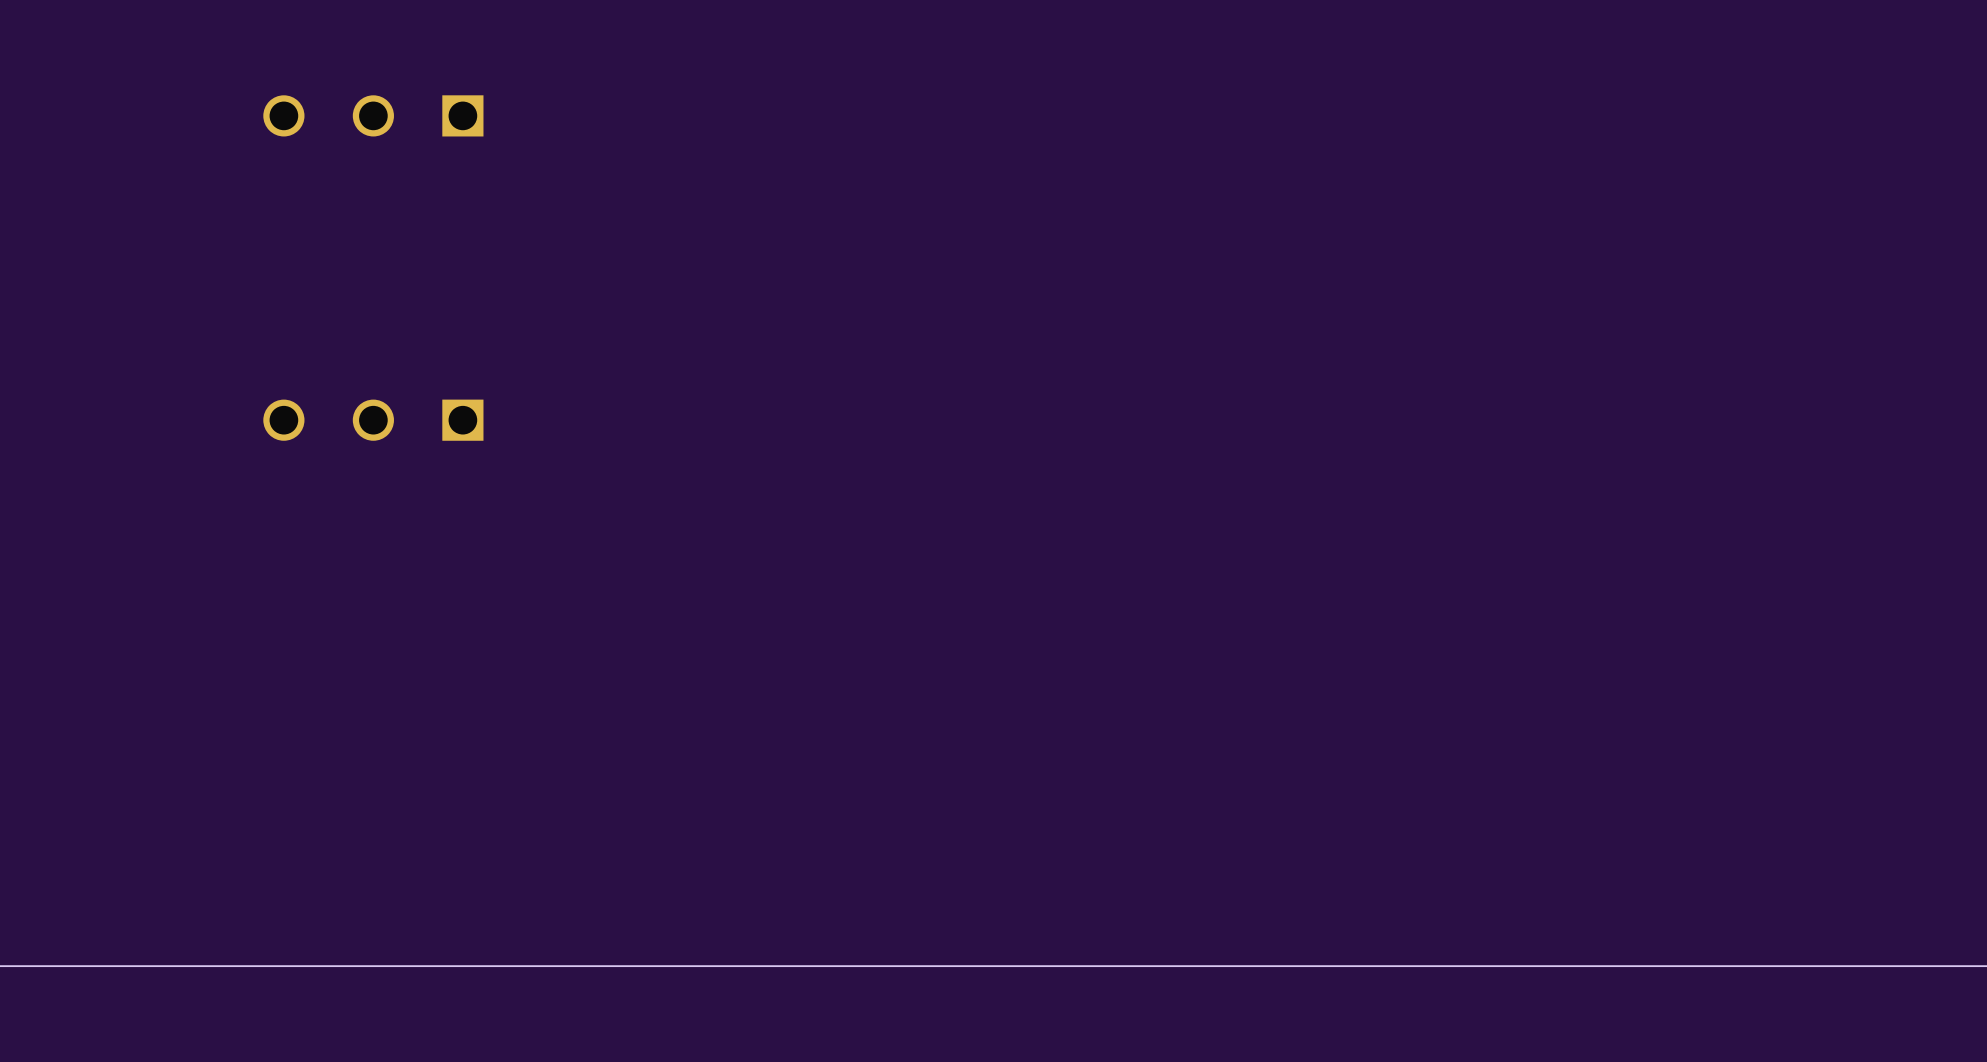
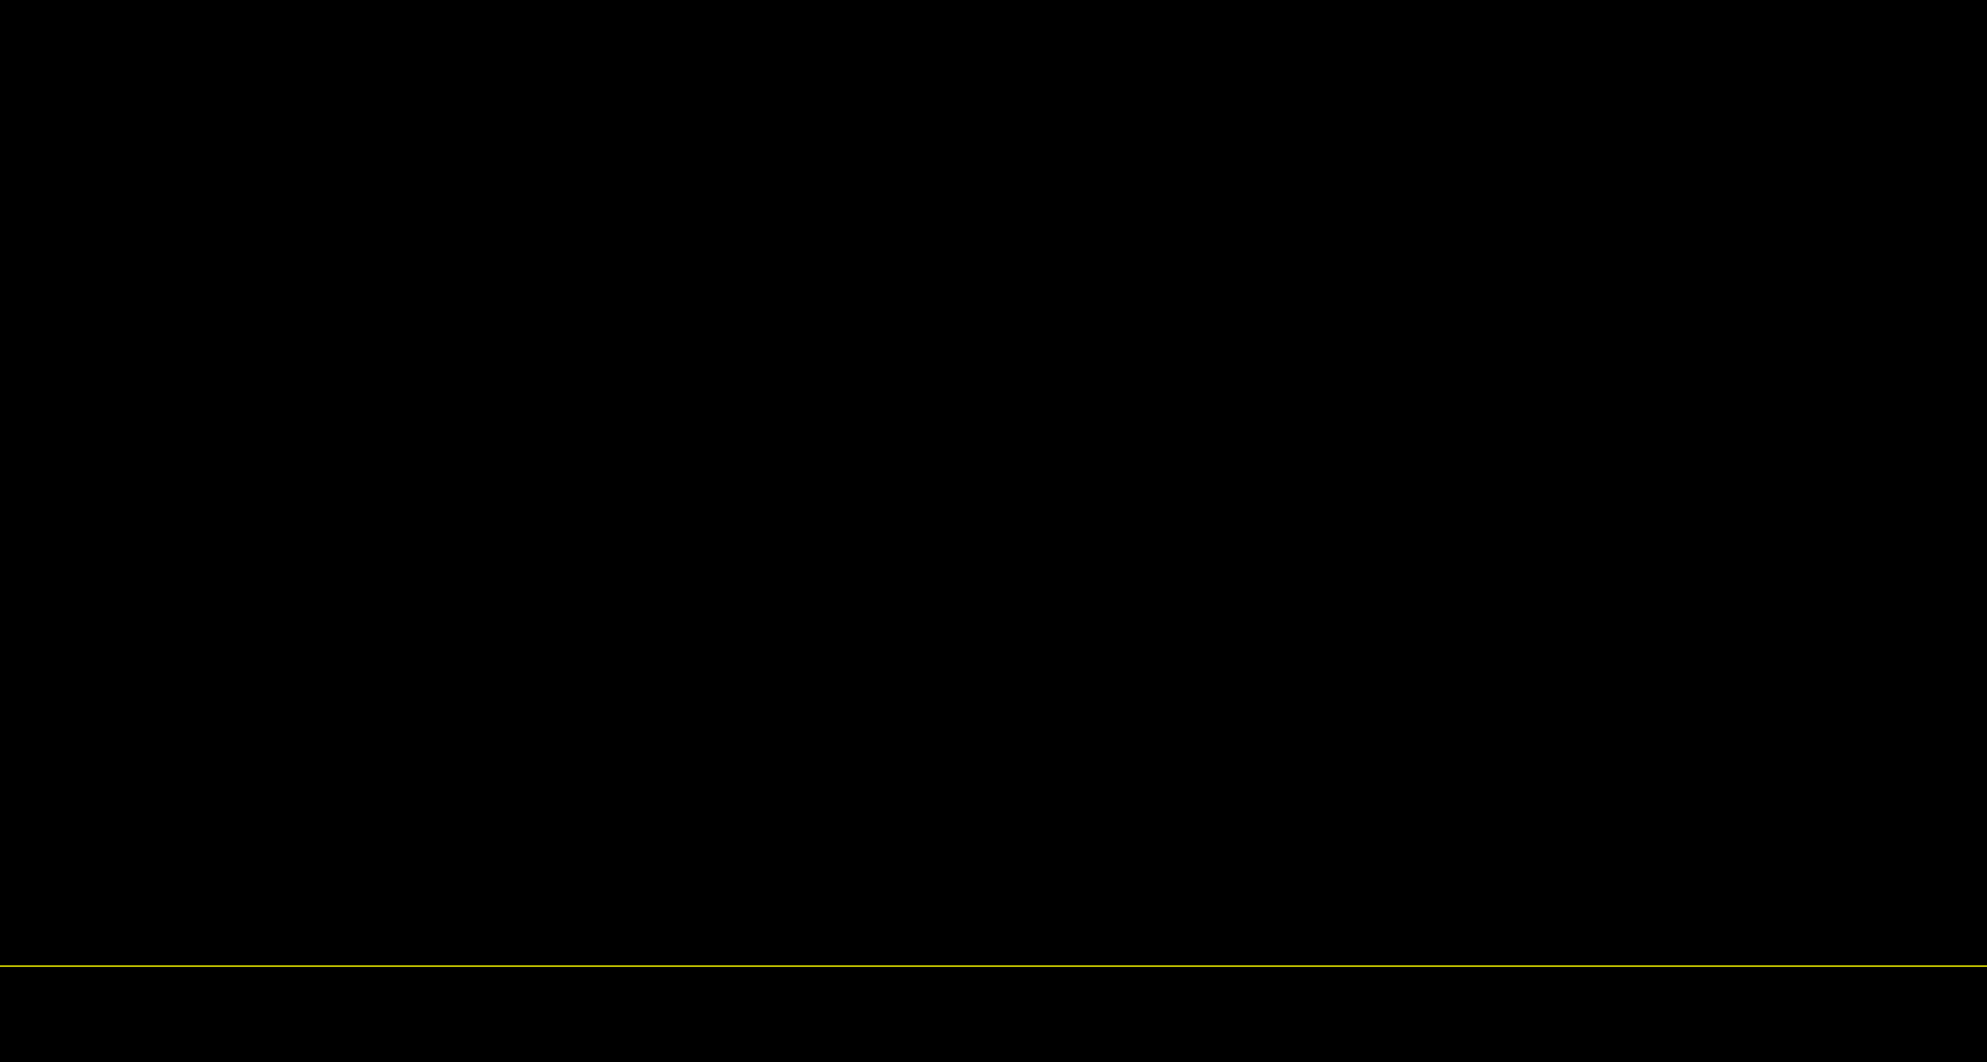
part: (373, 115) -> none
part: (373, 420) -> none

